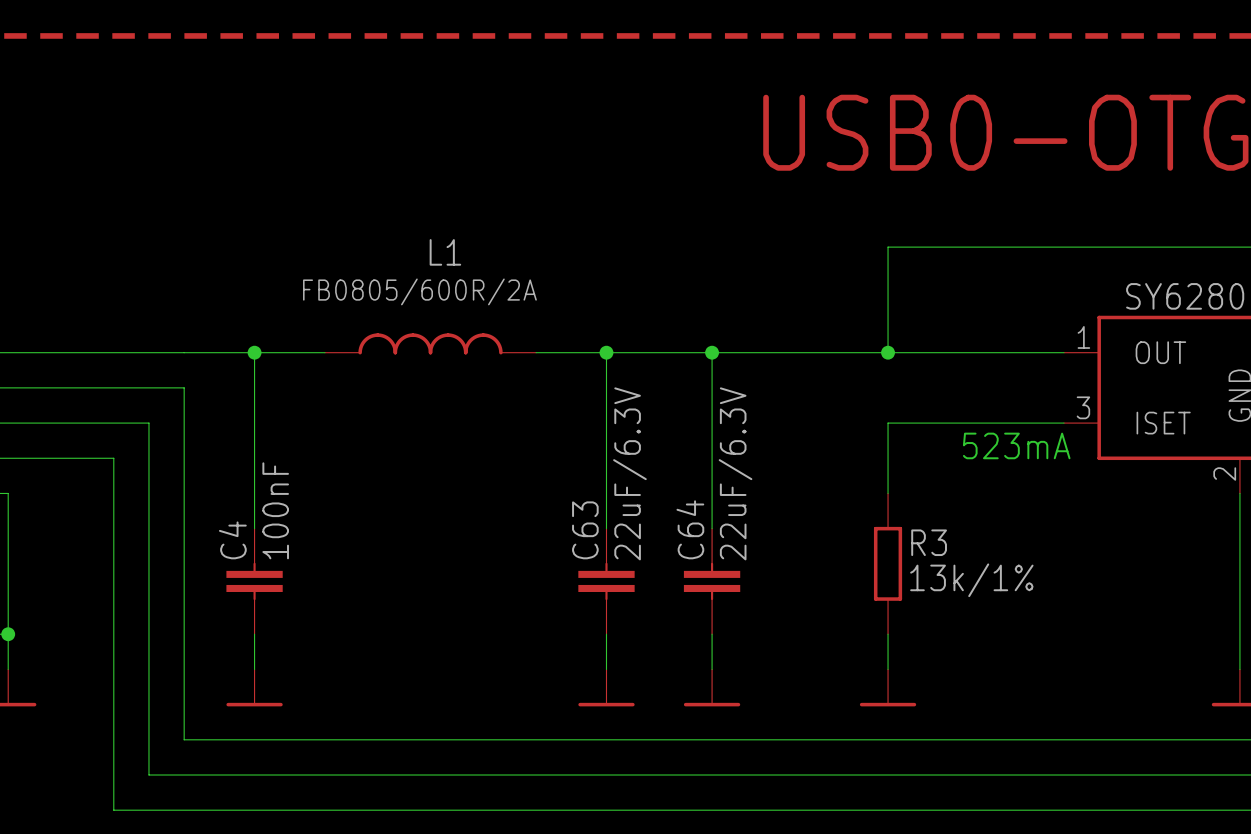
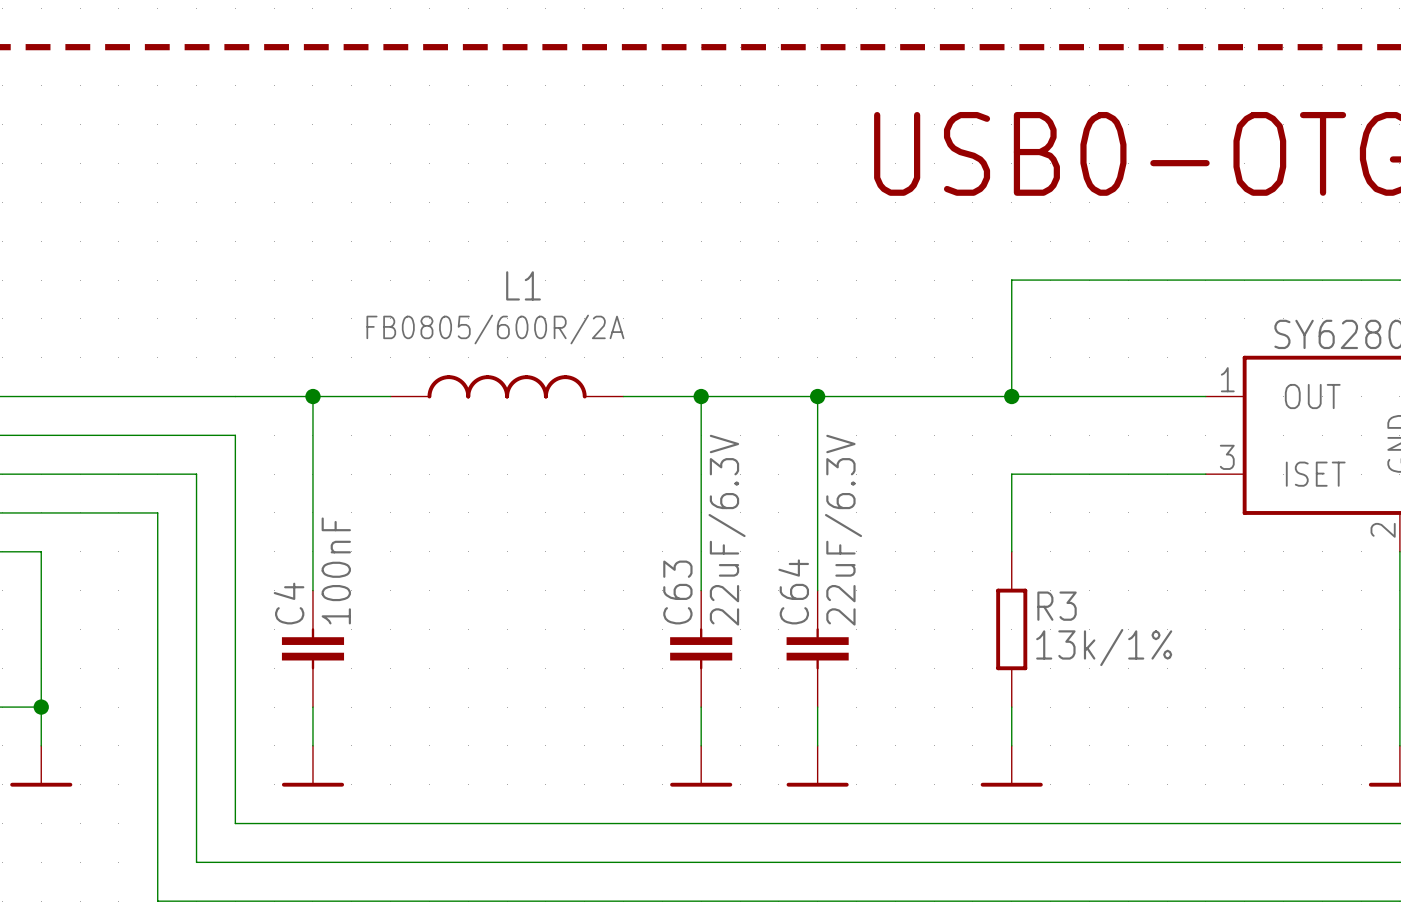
text: 523mA (1016, 445) -> none

